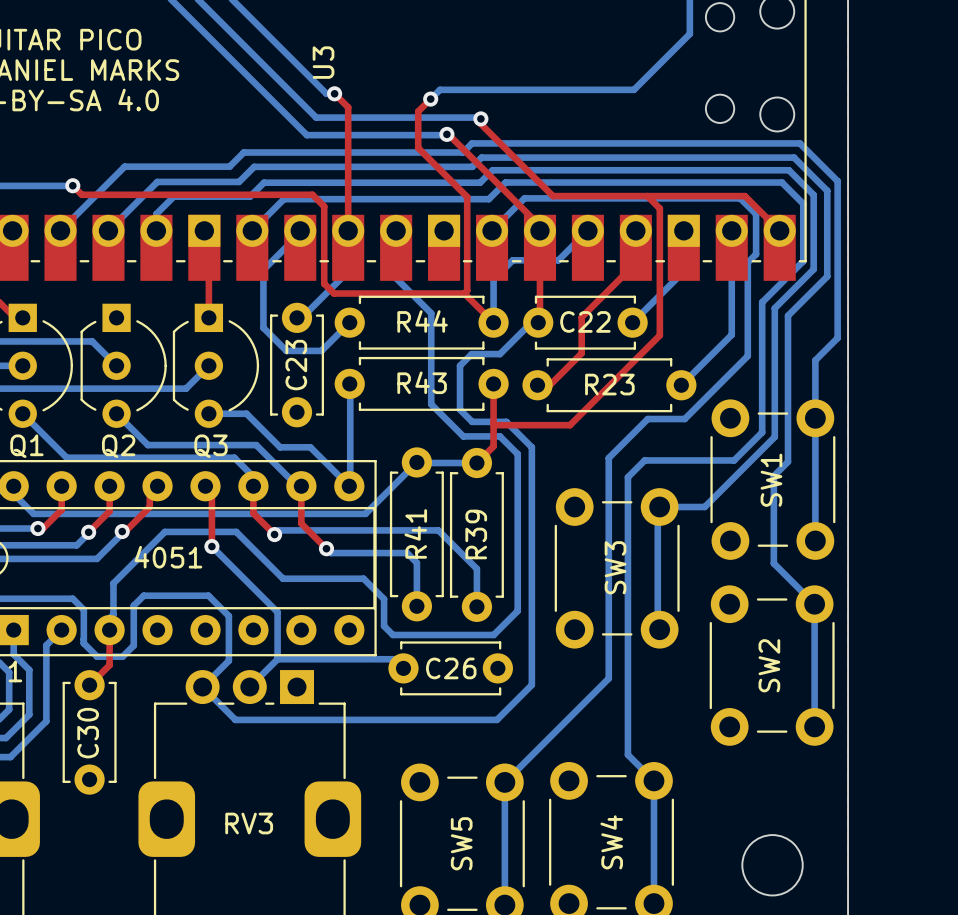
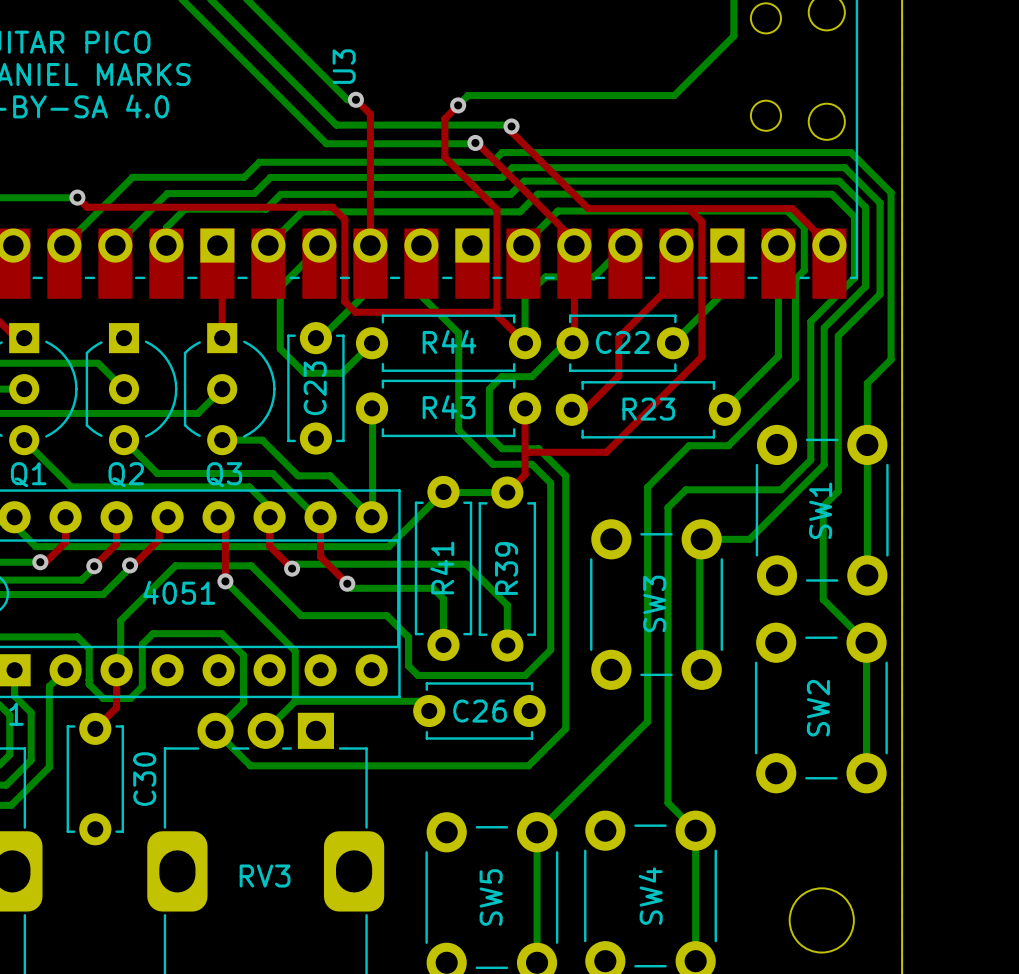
C30 name position: C30 (88, 733) -> C30 (144, 779)

